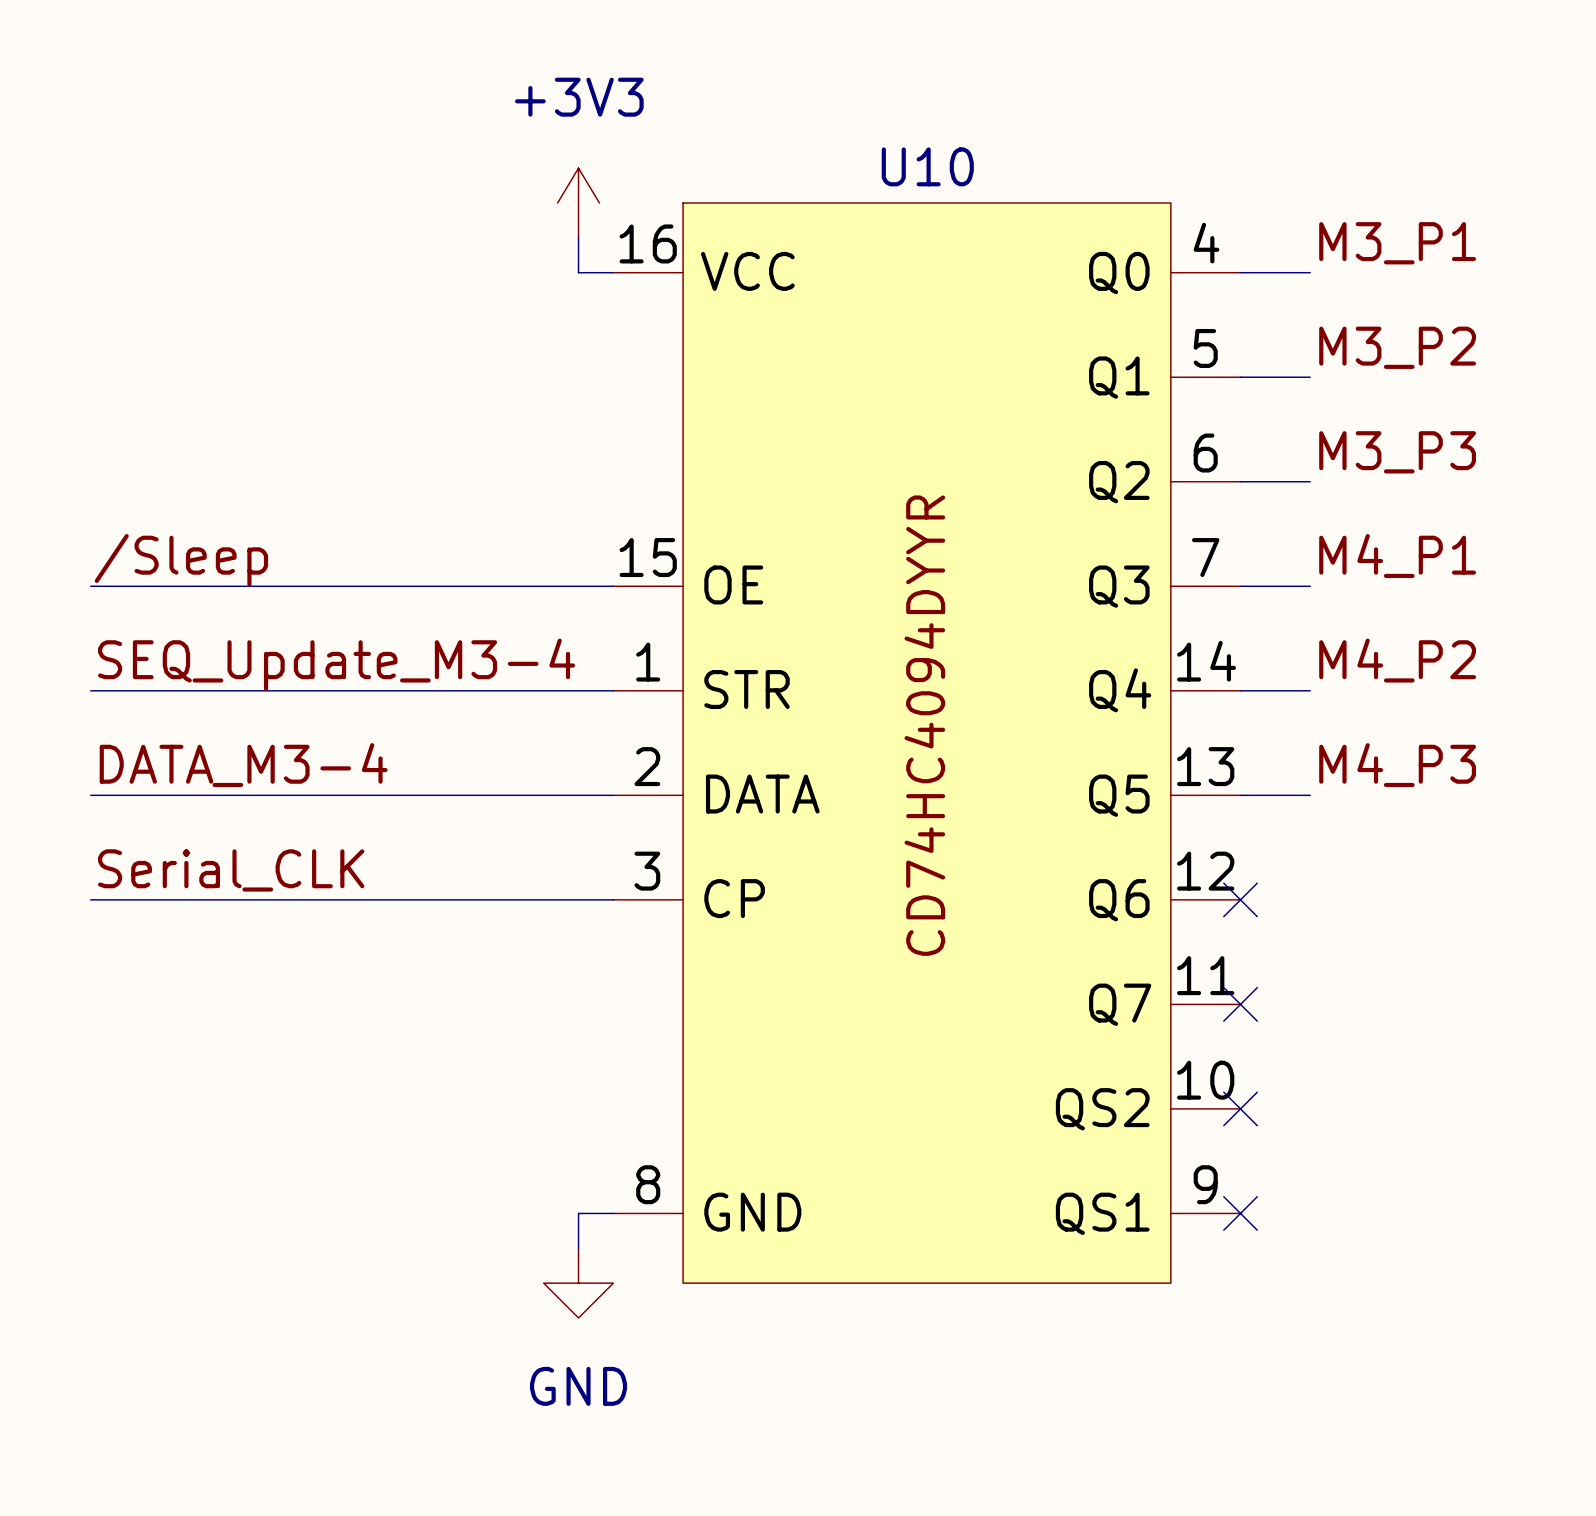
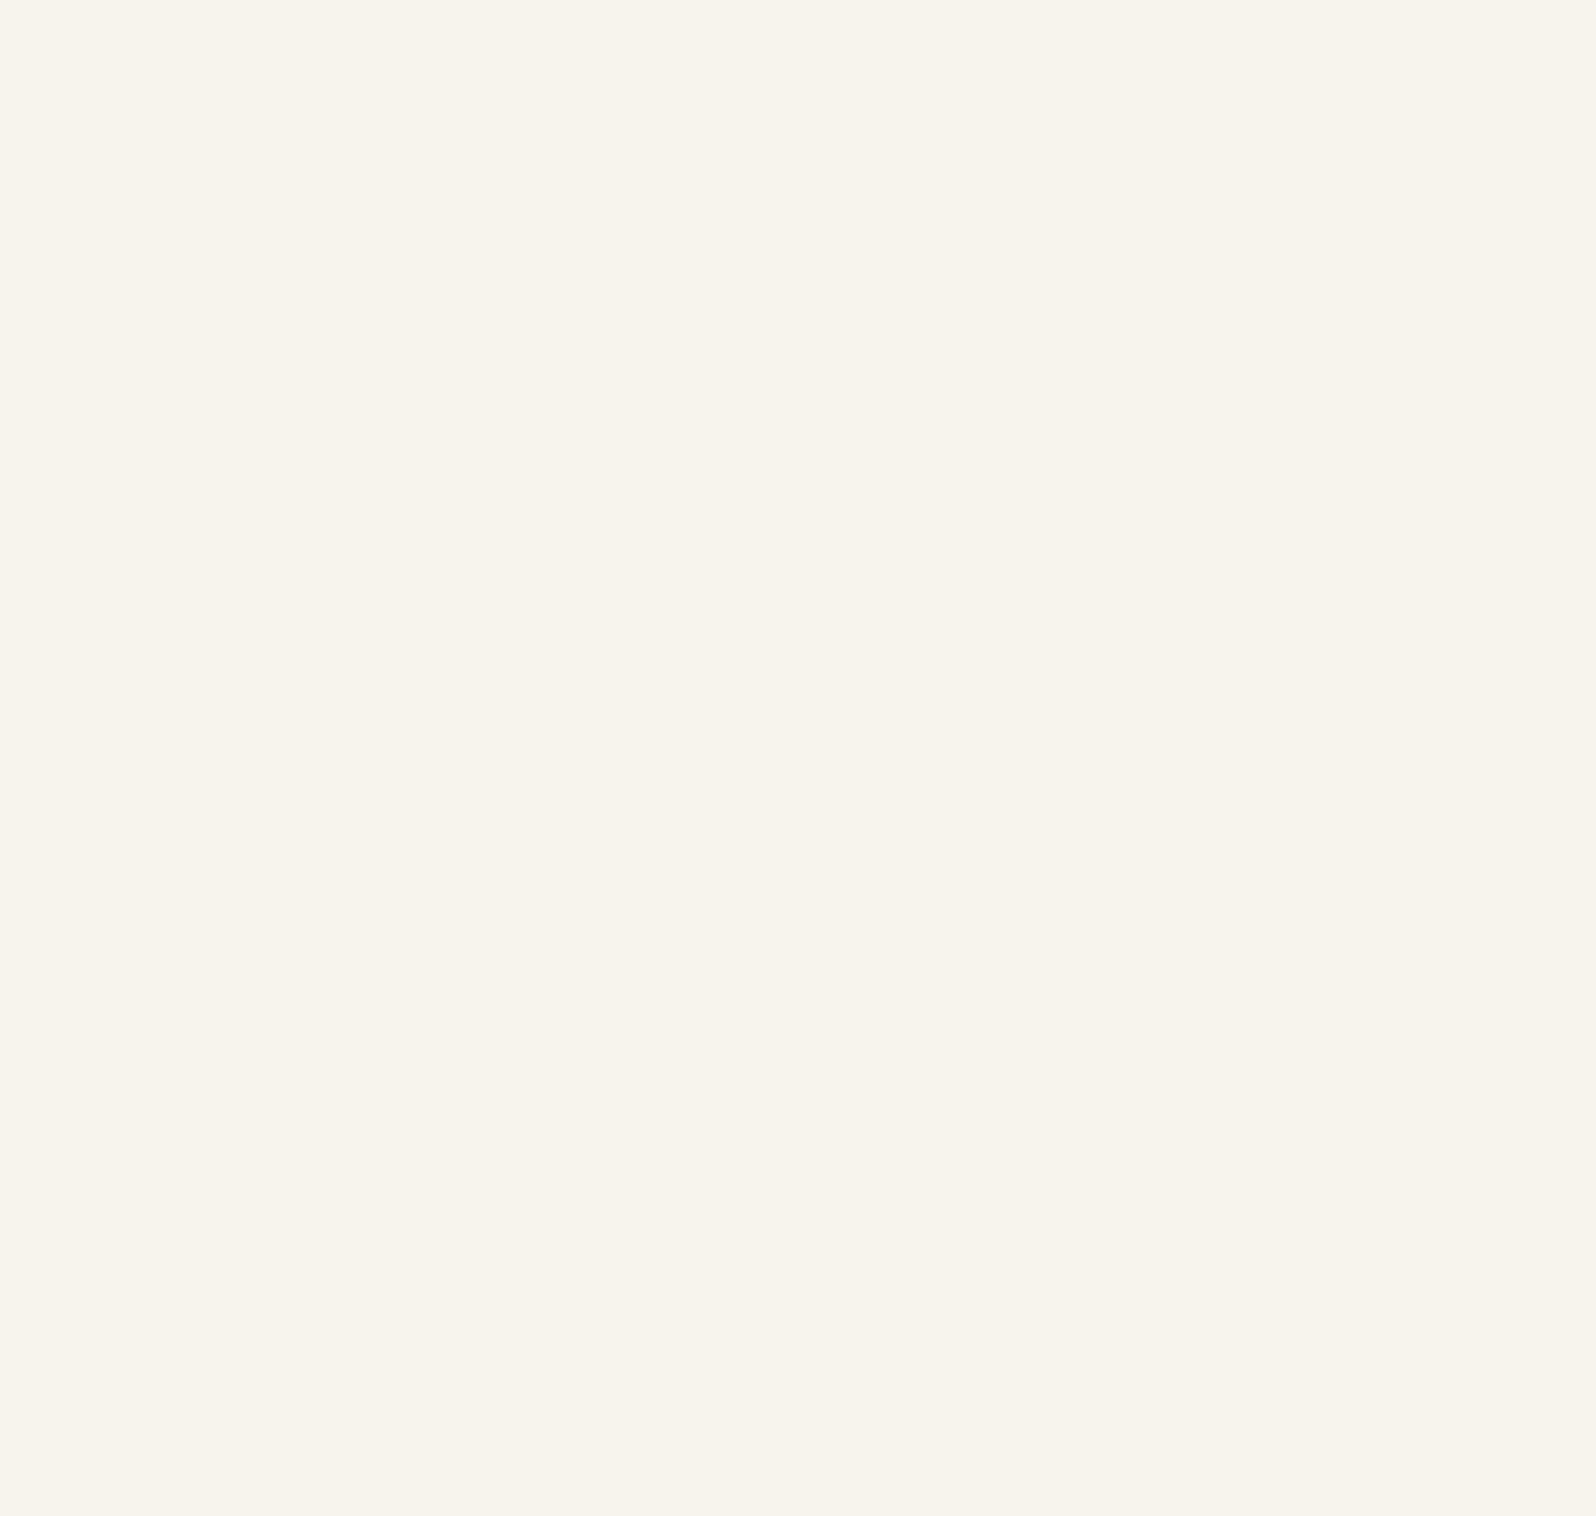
power symbol: +3V3 (578, 203) -> none
wire: (578, 237) (578, 272) (613, 272) -> none
label: M3_P1 (1397, 243) -> none
wire: (1240, 272) (1310, 272) -> none
label: M3_P2 (1397, 347) -> none
wire: (1240, 377) (1310, 377) -> none
label: M3_P3 (1397, 452) -> none
wire: (1240, 481) (1310, 481) -> none
label: M4_P1 (1397, 556) -> none
label: /Sleep (181, 560) -> none
wire: (90, 586) (613, 586) -> none
wire: (1240, 586) (1310, 586) -> none
label: M4_P2 (1397, 660) -> none
label: SEQ_Update_M3-4 (336, 664) -> none
wire: (90, 690) (613, 690) -> none
wire: (1240, 690) (1310, 690) -> none
U10: (926, 743) -> none
label: DATA_M3-4 (243, 765) -> none
label: M4_P3 (1397, 765) -> none
wire: (90, 795) (613, 795) -> none
wire: (1240, 795) (1310, 795) -> none
label: Serial_CLK (231, 870) -> none
wire: (90, 899) (613, 899) -> none
no-connect mark: (1240, 899) -> none
no-connect mark: (1240, 1004) -> none
no-connect mark: (1240, 1108) -> none
wire: (613, 1213) (578, 1213) (578, 1248) -> none
no-connect mark: (1240, 1213) -> none
power symbol: GND (578, 1283) -> none

